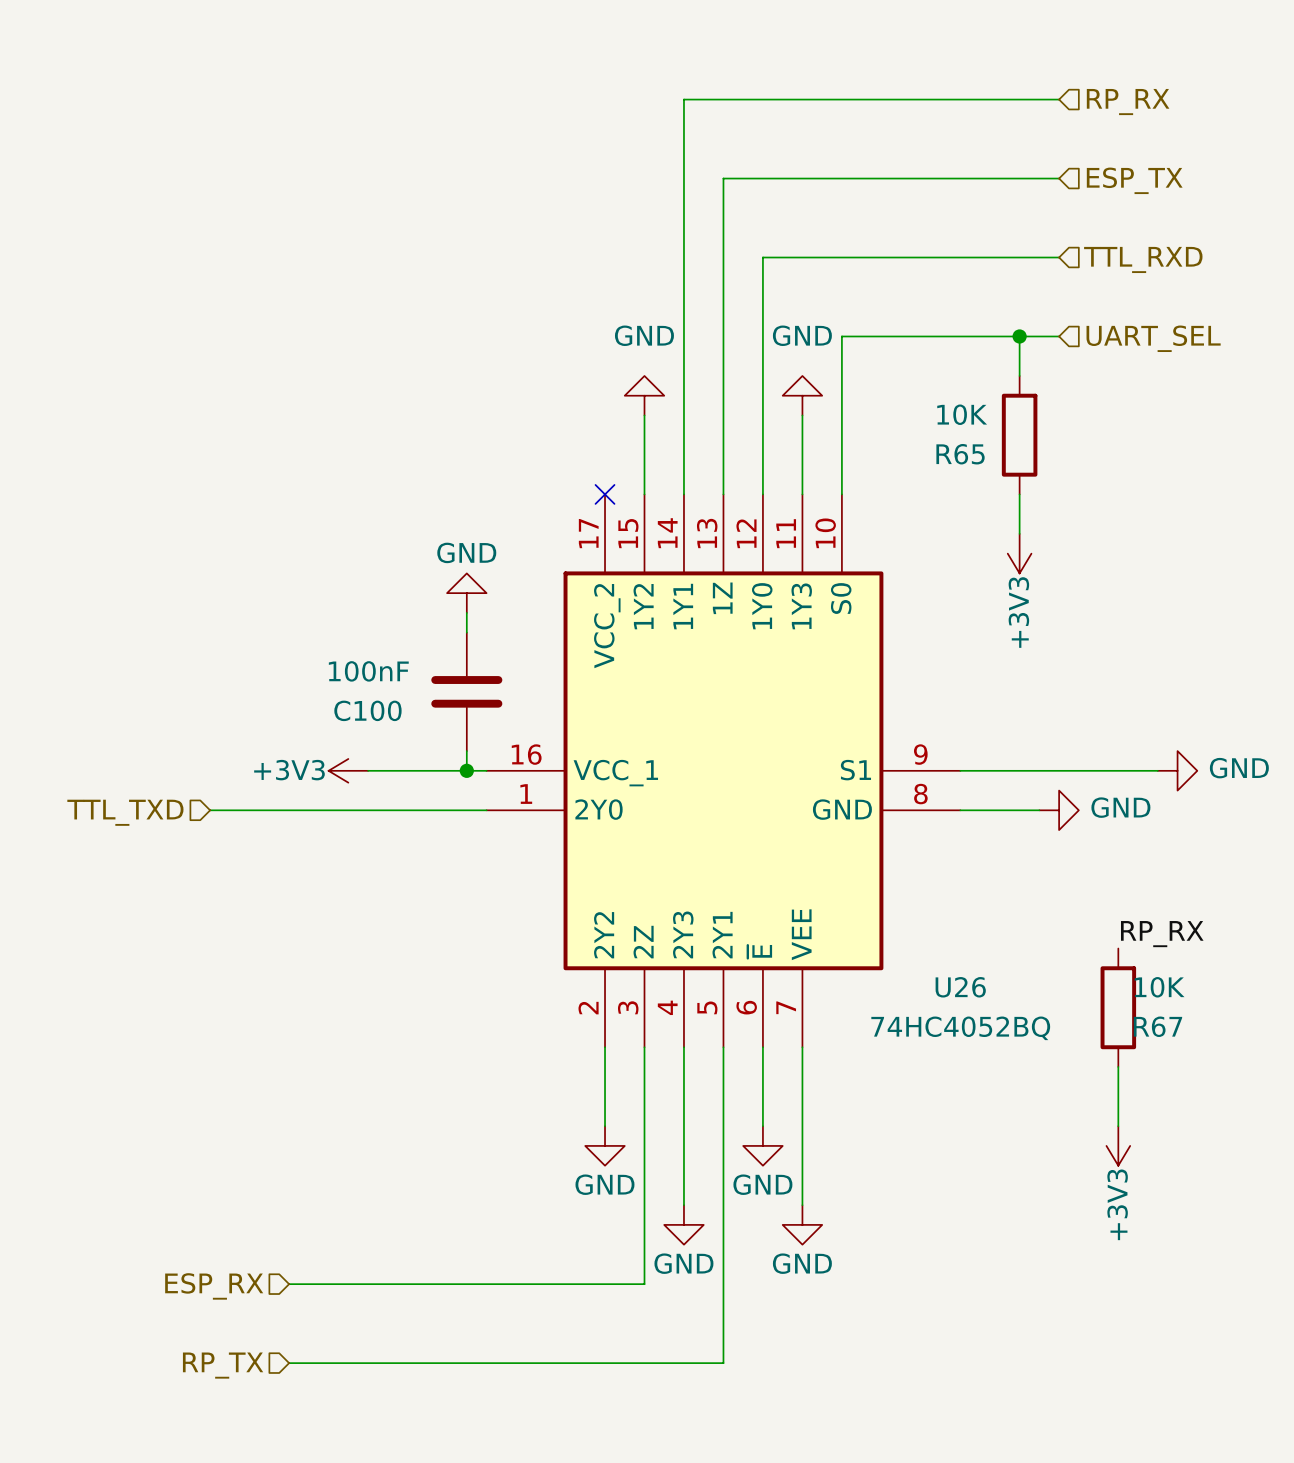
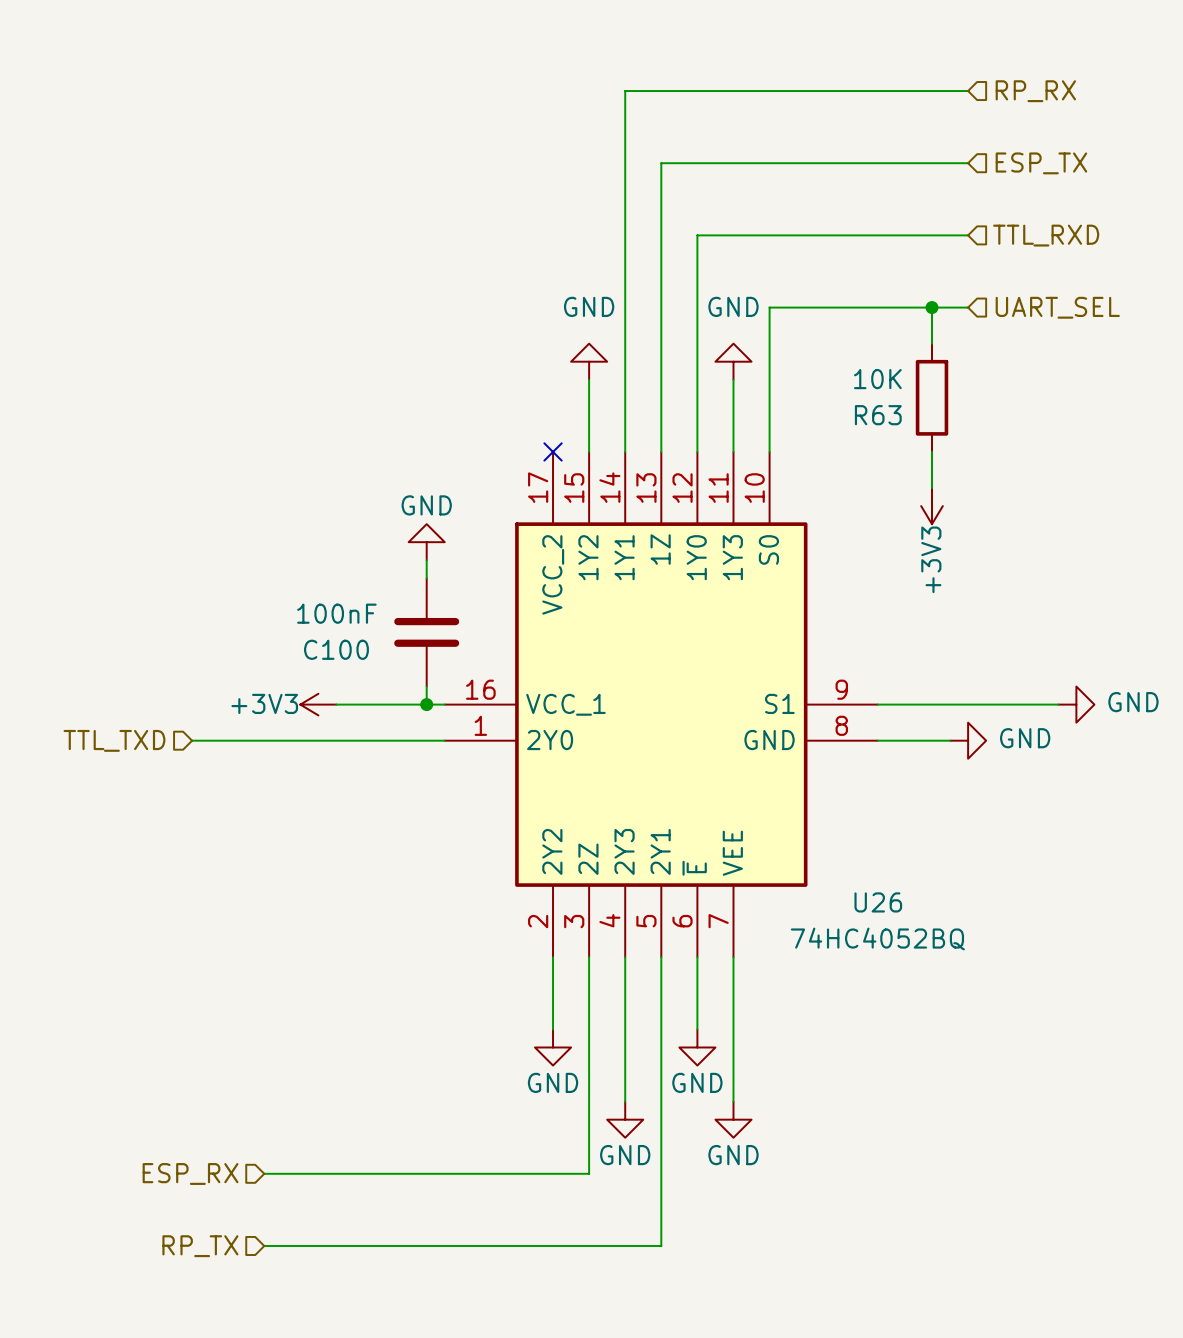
R65 name: R65 (960, 454) -> R63 (878, 415)
label: RP_RX (1162, 934) -> none
R67: 10K (1118, 1007) -> none
wire: (1118, 1066) (1118, 1126) -> none
power symbol: +3V3 (1118, 1145) -> none

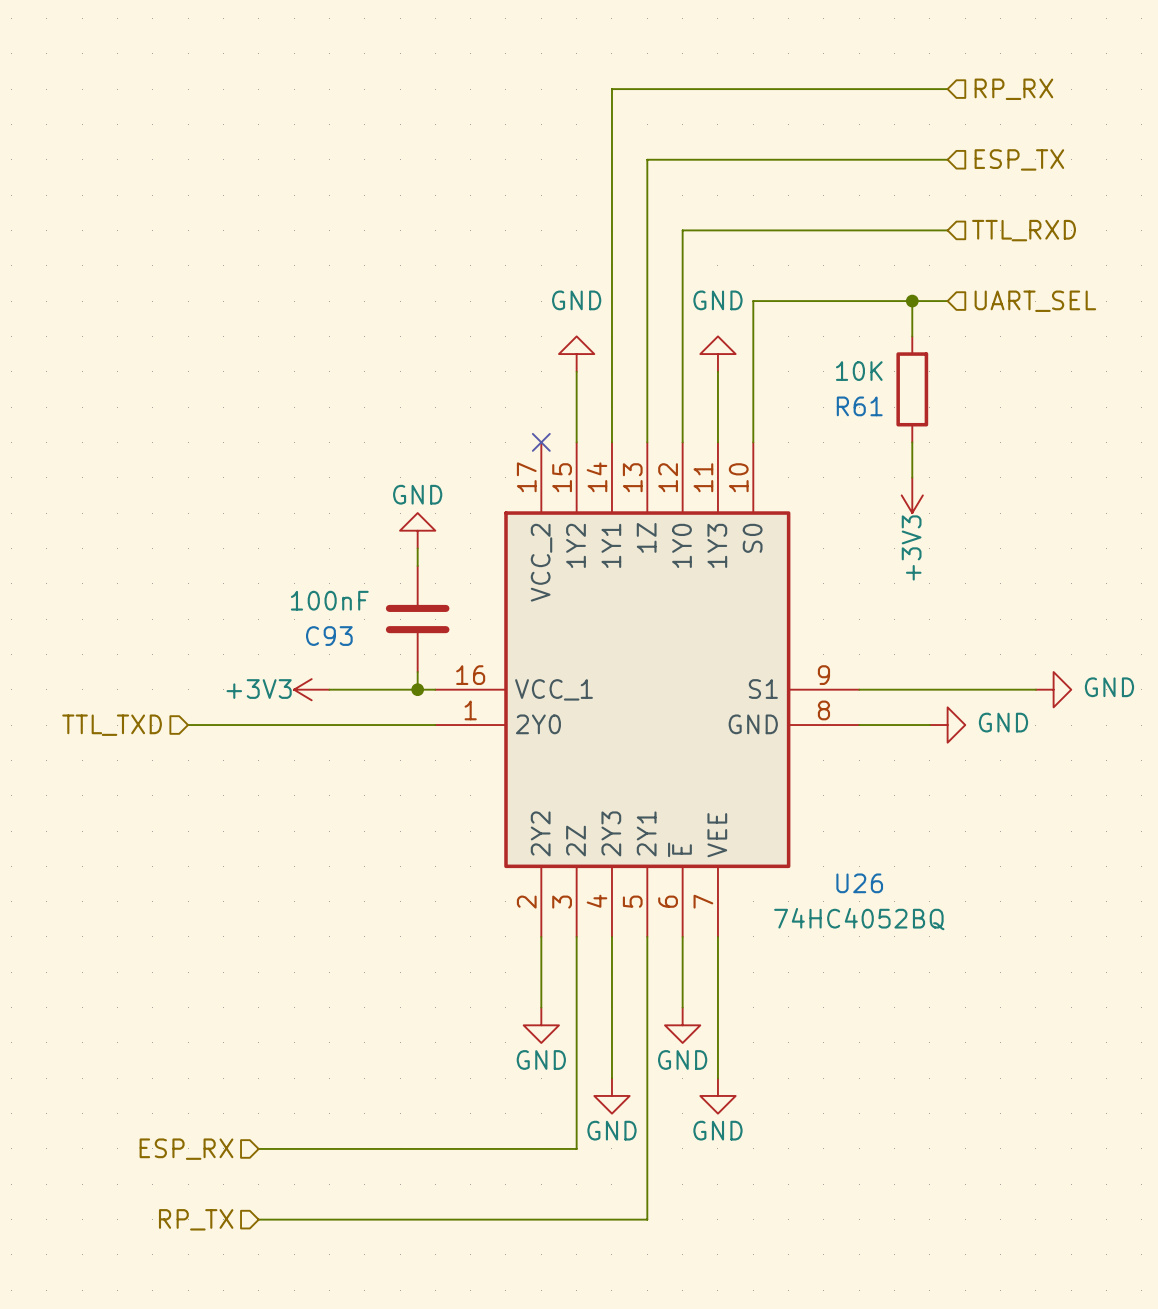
R63 name: R63 (878, 415) -> R61 (859, 406)
C100 name: C100 (336, 649) -> C93 (329, 636)

